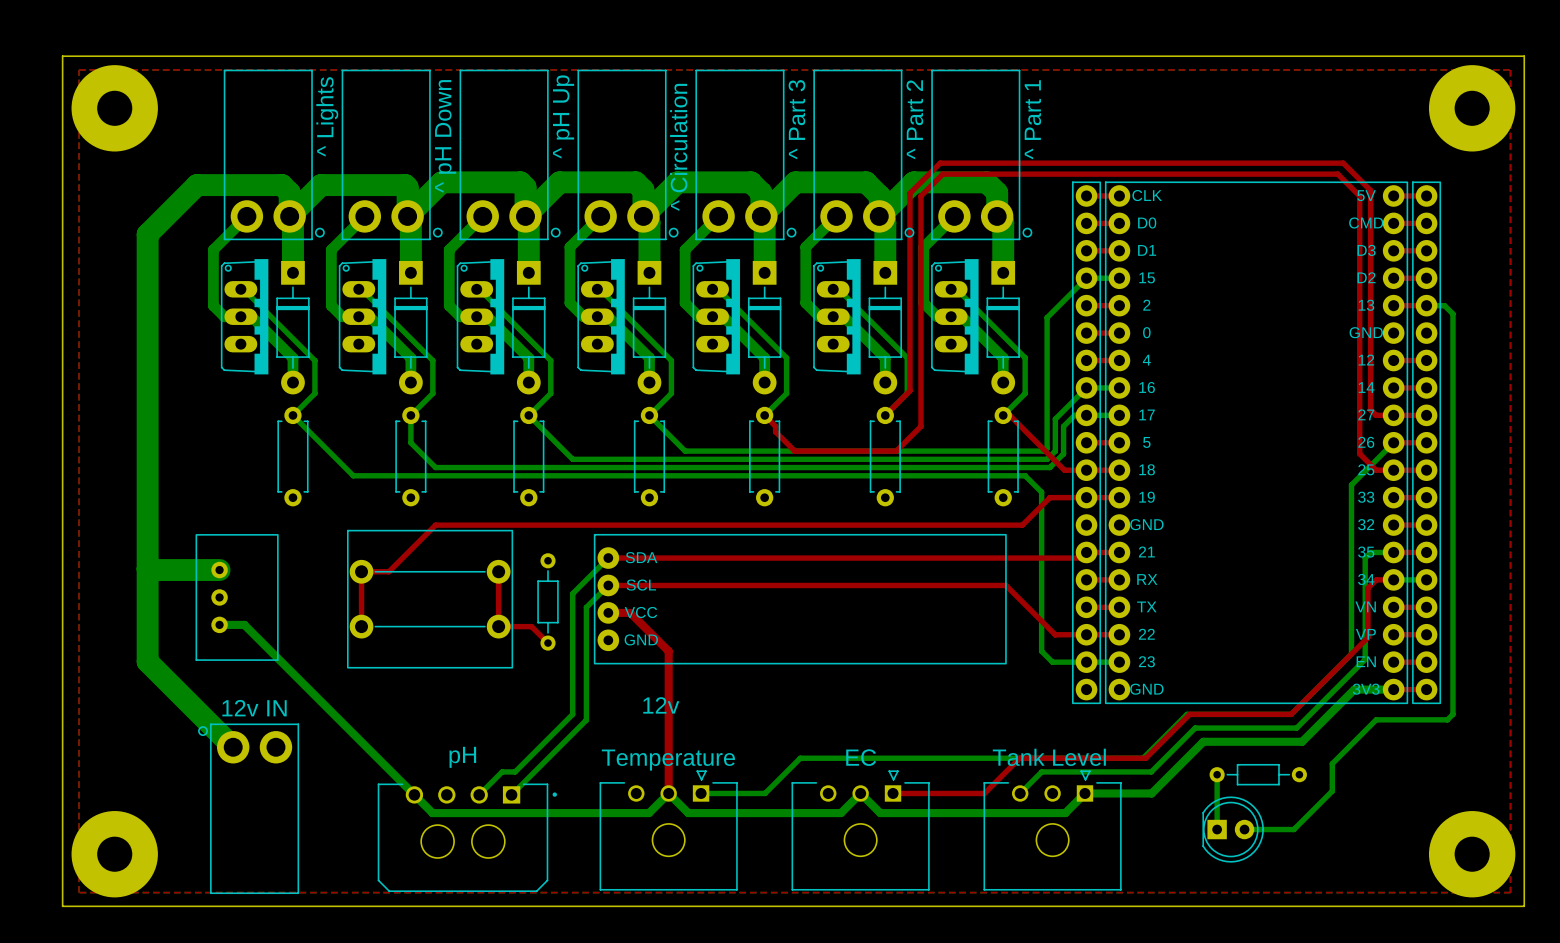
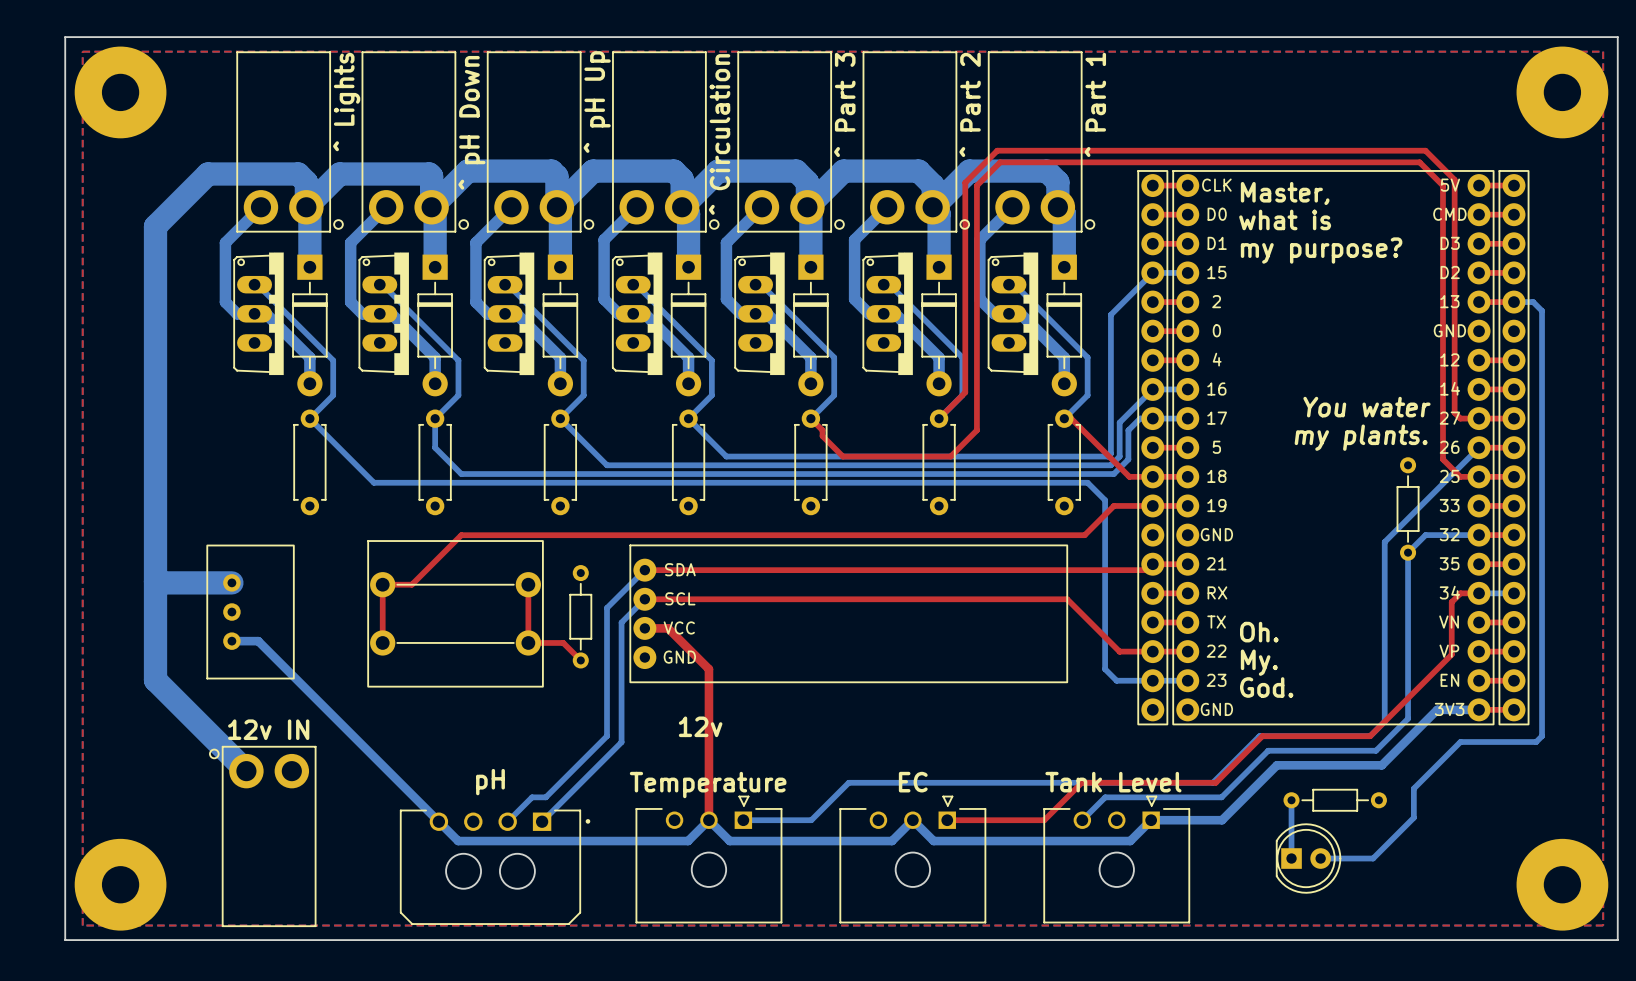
text: none -> Master, (1285, 193)
text: none -> what is (1285, 219)
text: none -> my purpose? (1321, 250)
text: none -> You water (1366, 407)
text: none -> my plants. (1361, 437)
bottom track: (1351, 484) (1351, 654) (1304, 700) -> (1434, 492) (1384, 542) (1384, 721)
part: none -> (1408, 508)
bottom track: (1393, 552) (1370, 552) (1365, 558) (1365, 659) (1326, 697) -> (1479, 535) (1425, 535) (1408, 552) (1408, 718)
text: none -> Oh. (1259, 632)
text: none -> My. (1259, 662)
text: none -> God. (1266, 687)

